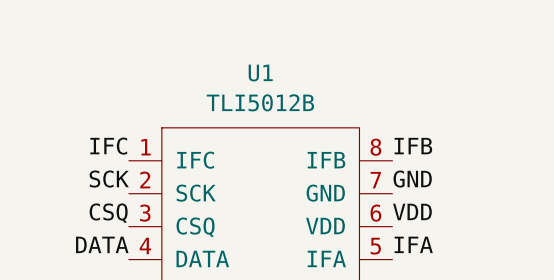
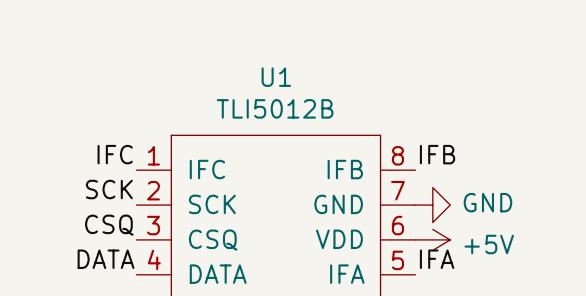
label: GND (412, 179) -> none
power symbol: none -> GND (432, 205)
label: VDD (412, 211) -> none
power symbol: none -> +5V (432, 239)

